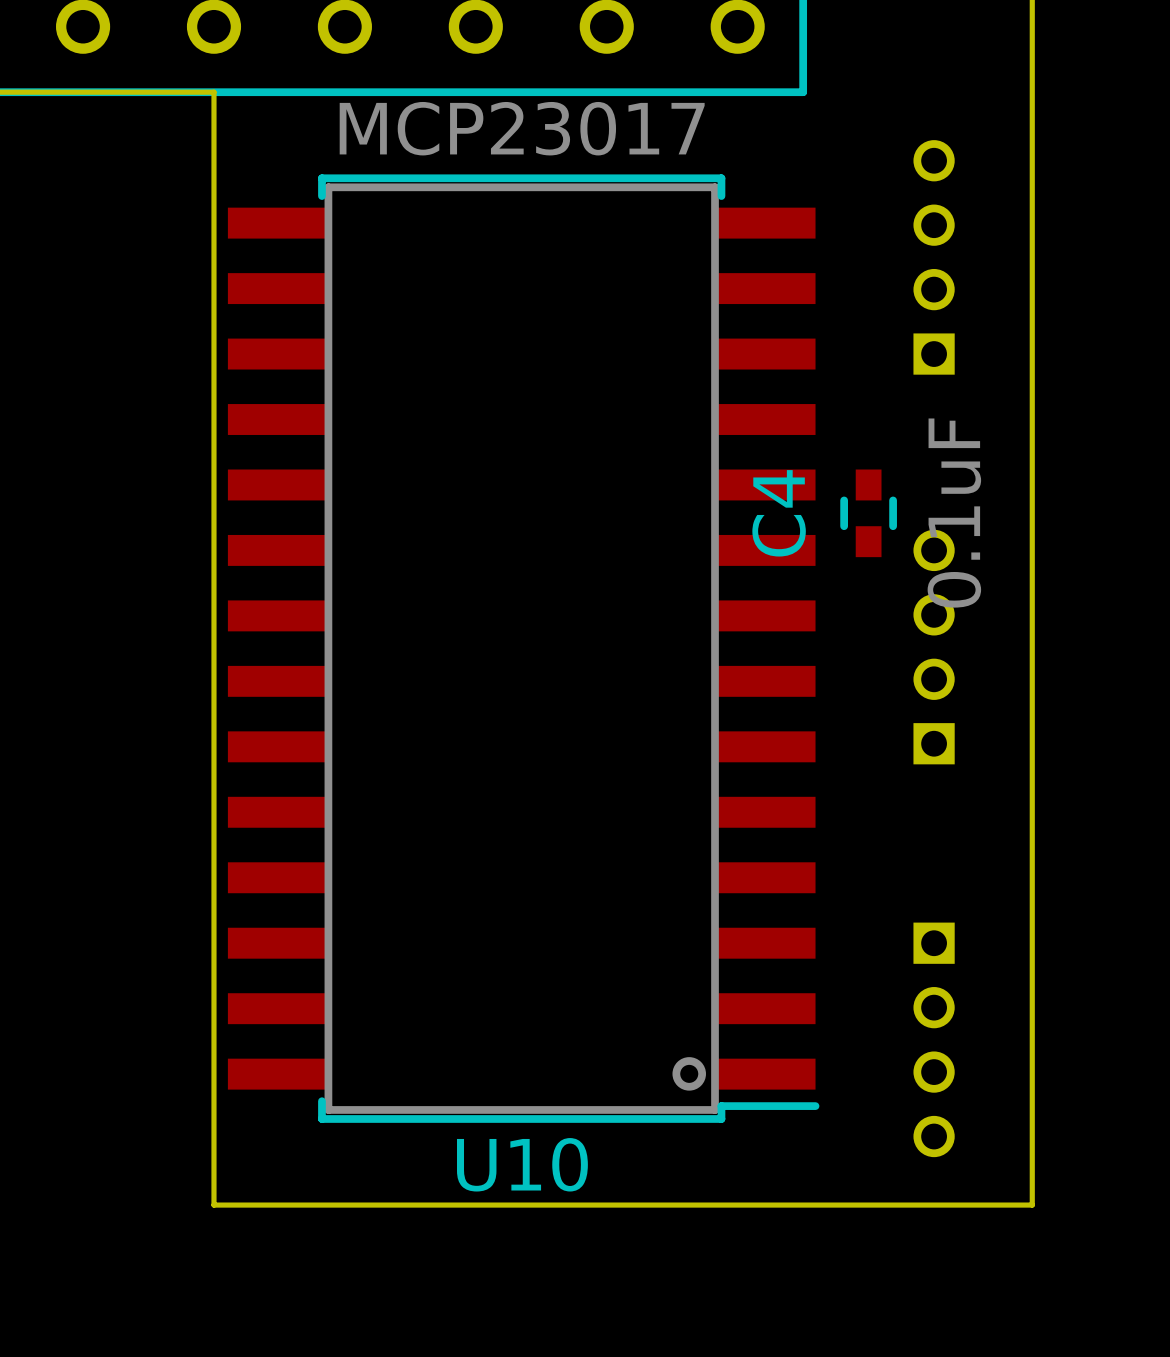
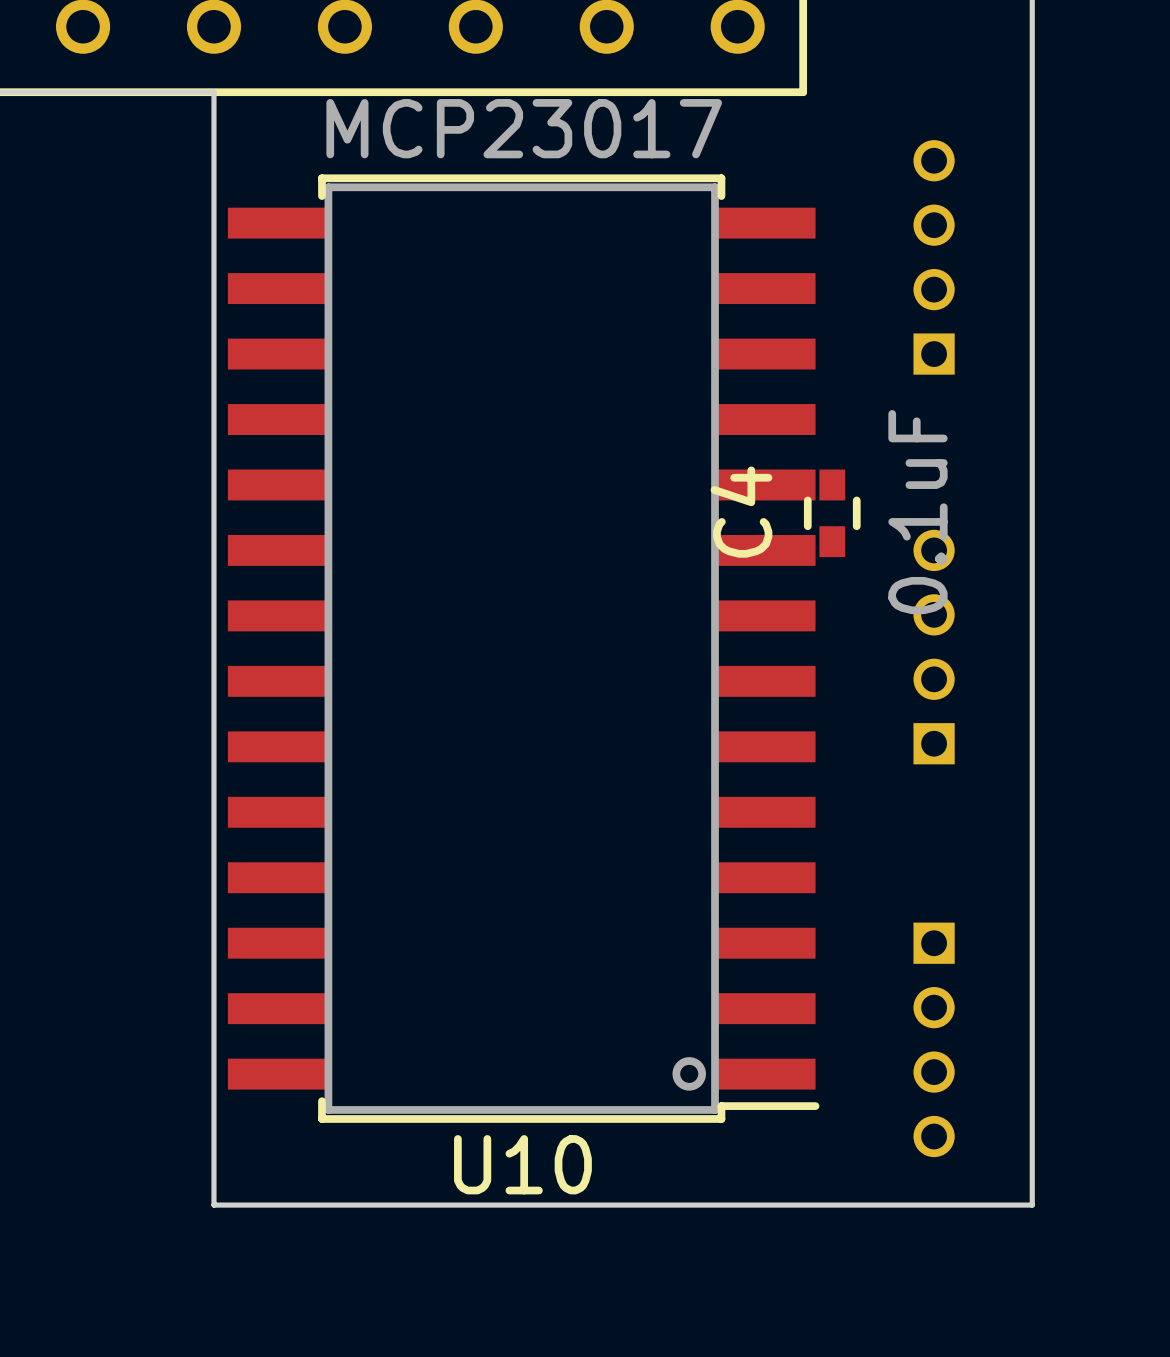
C4 position: (868, 513) -> (832, 513)

